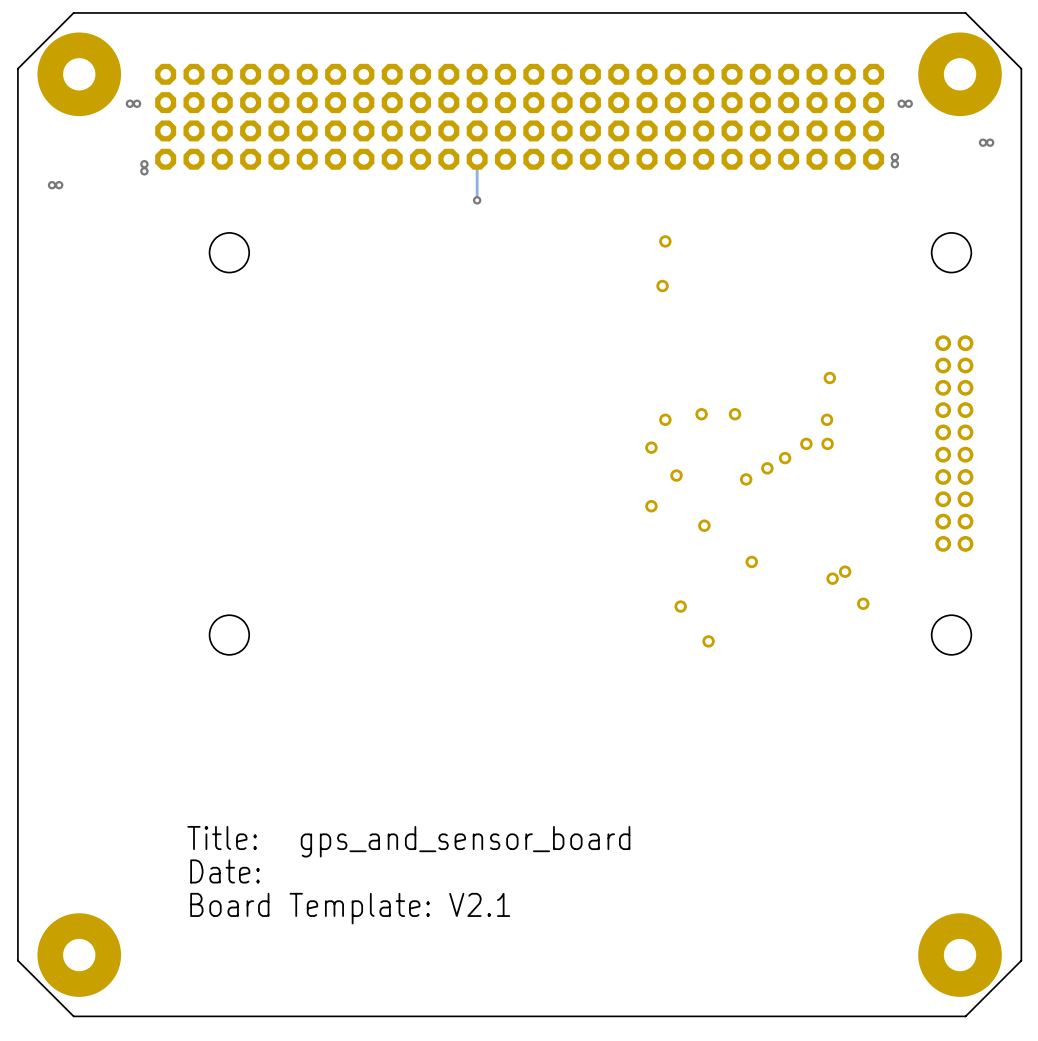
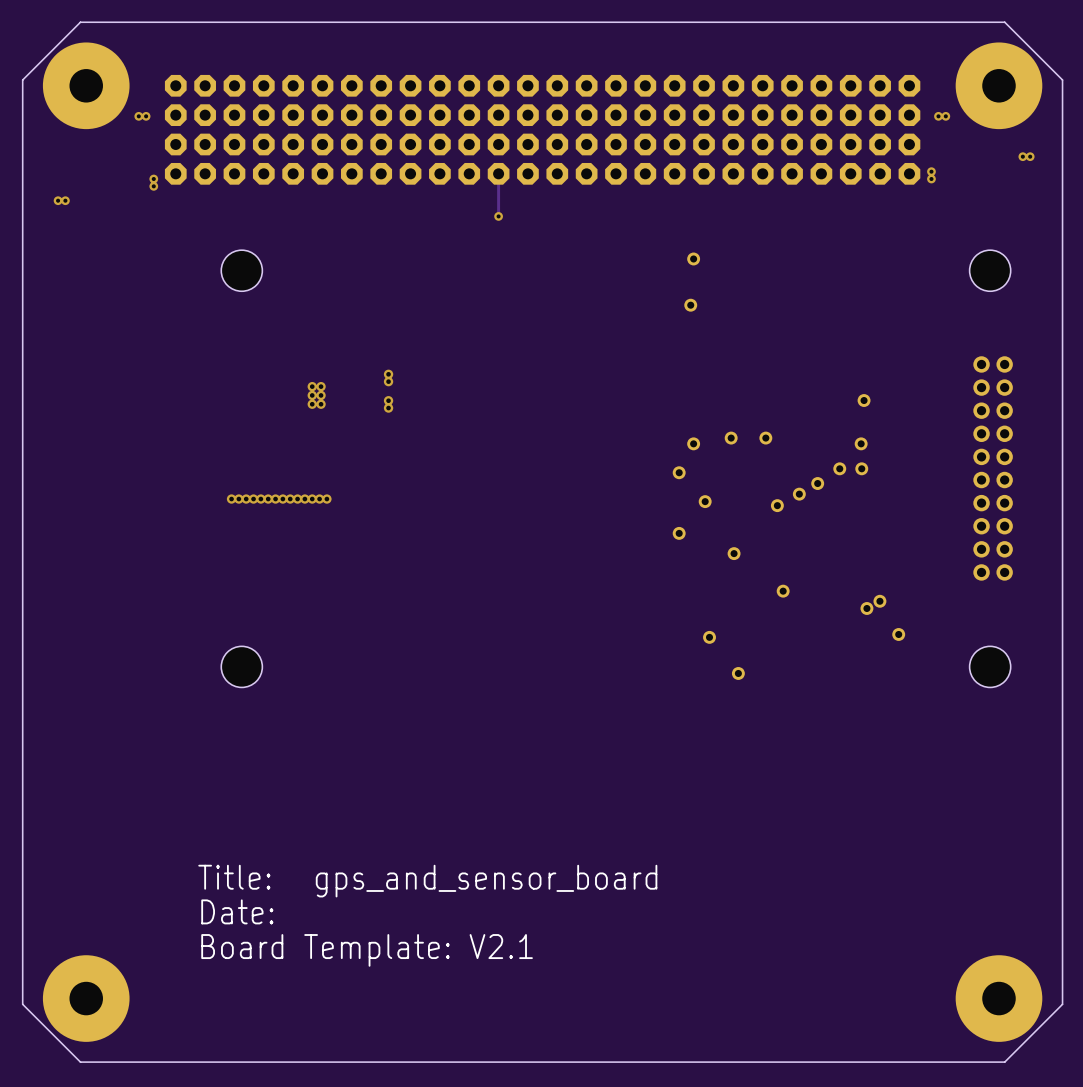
via: none -> (388, 374)
via: none -> (388, 381)
via: none -> (312, 386)
via: none -> (321, 386)
via: none -> (312, 395)
via: none -> (321, 395)
via: none -> (388, 400)
via: none -> (312, 404)
via: none -> (321, 404)
via: none -> (388, 408)
via: none -> (231, 499)
via: none -> (238, 499)
via: none -> (246, 499)
via: none -> (253, 499)
via: none -> (260, 499)
via: none -> (268, 499)
via: none -> (275, 499)
via: none -> (282, 499)
via: none -> (290, 499)
via: none -> (297, 499)
via: none -> (304, 499)
via: none -> (312, 499)
via: none -> (319, 499)
via: none -> (326, 499)

